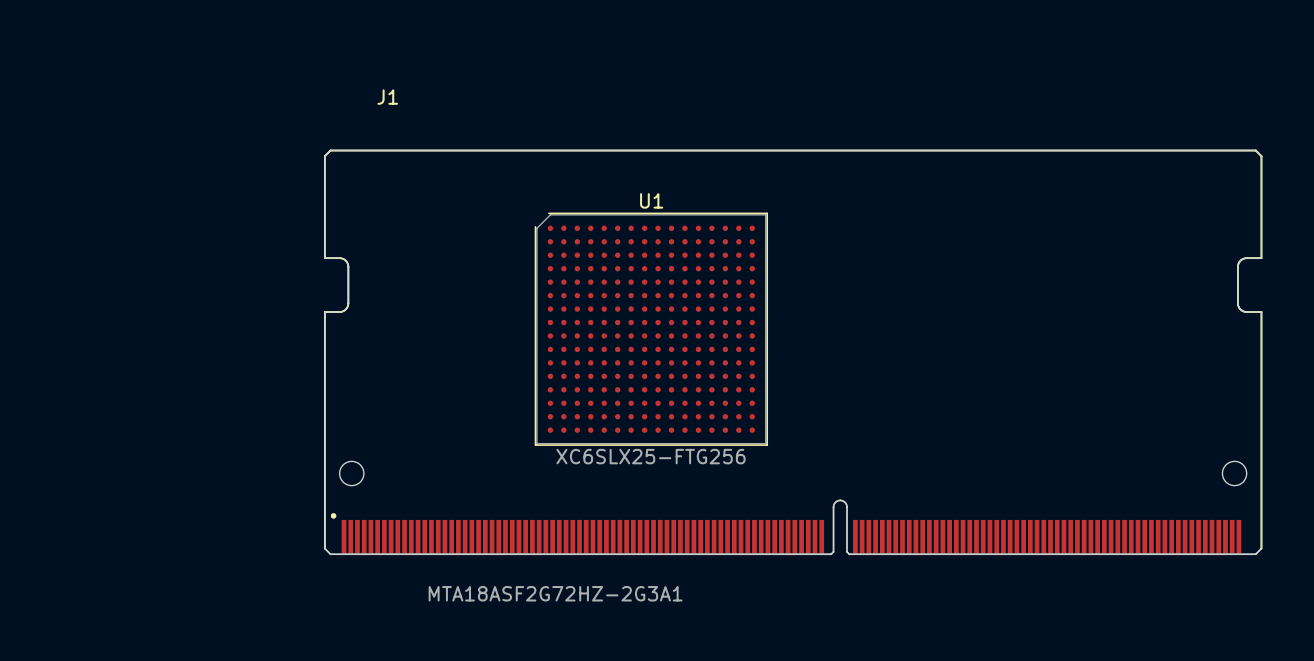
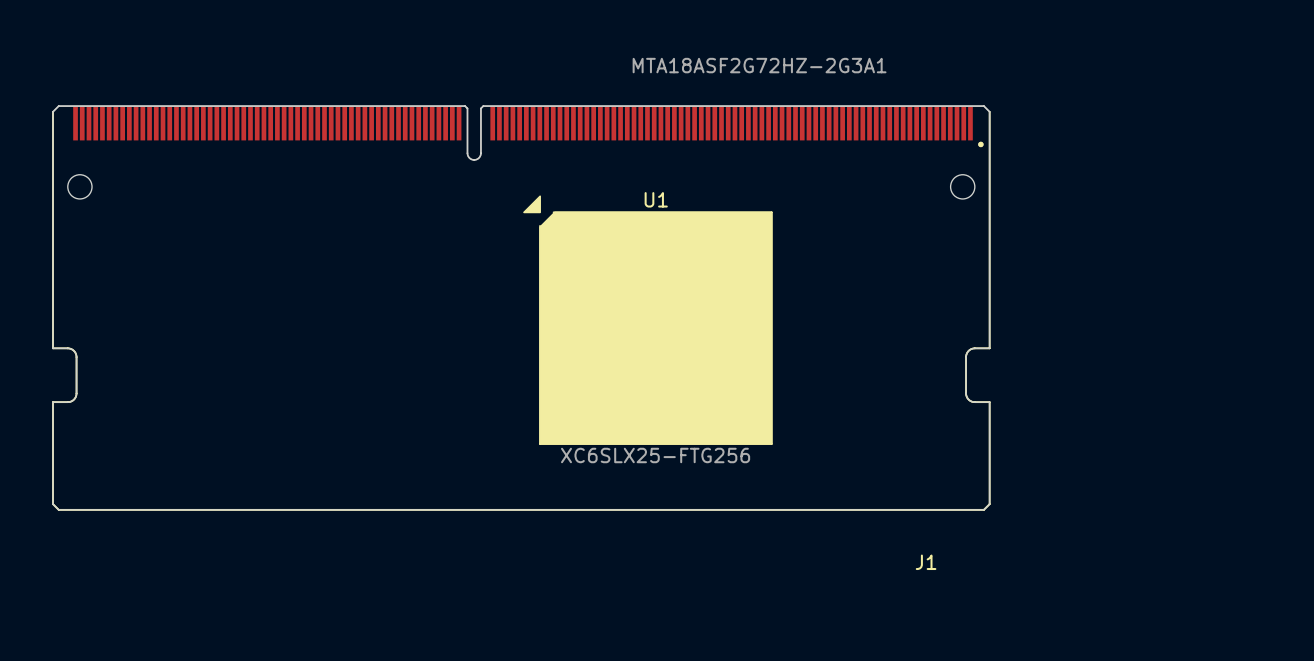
U1 footprint: [534, 212, 769, 446] -> [523, 195, 773, 445]
J1 rotation: 0° (793, 352) -> 180° (521, 307)

